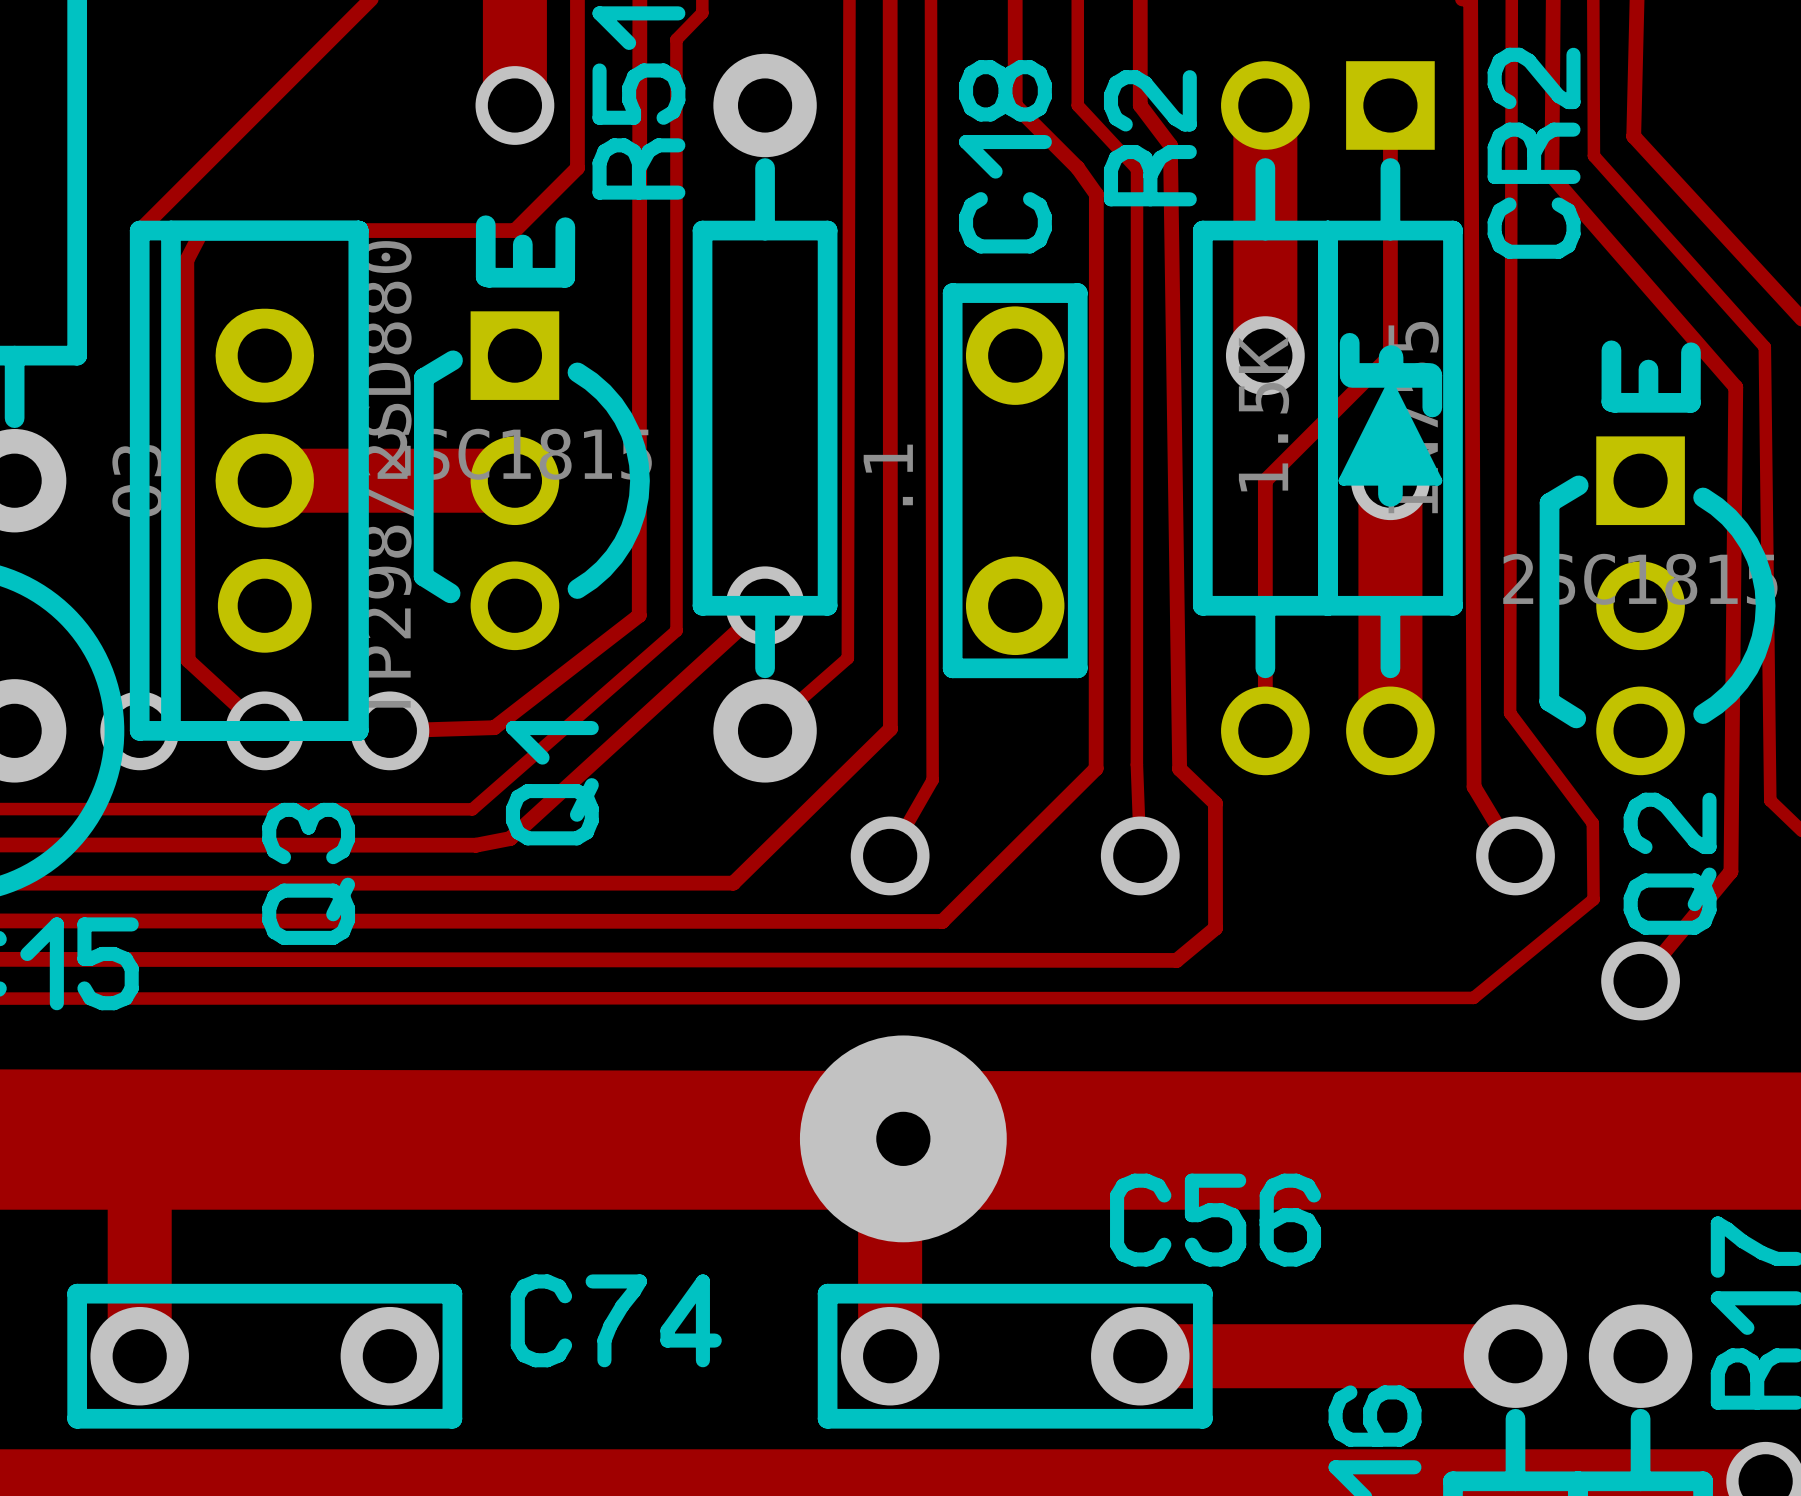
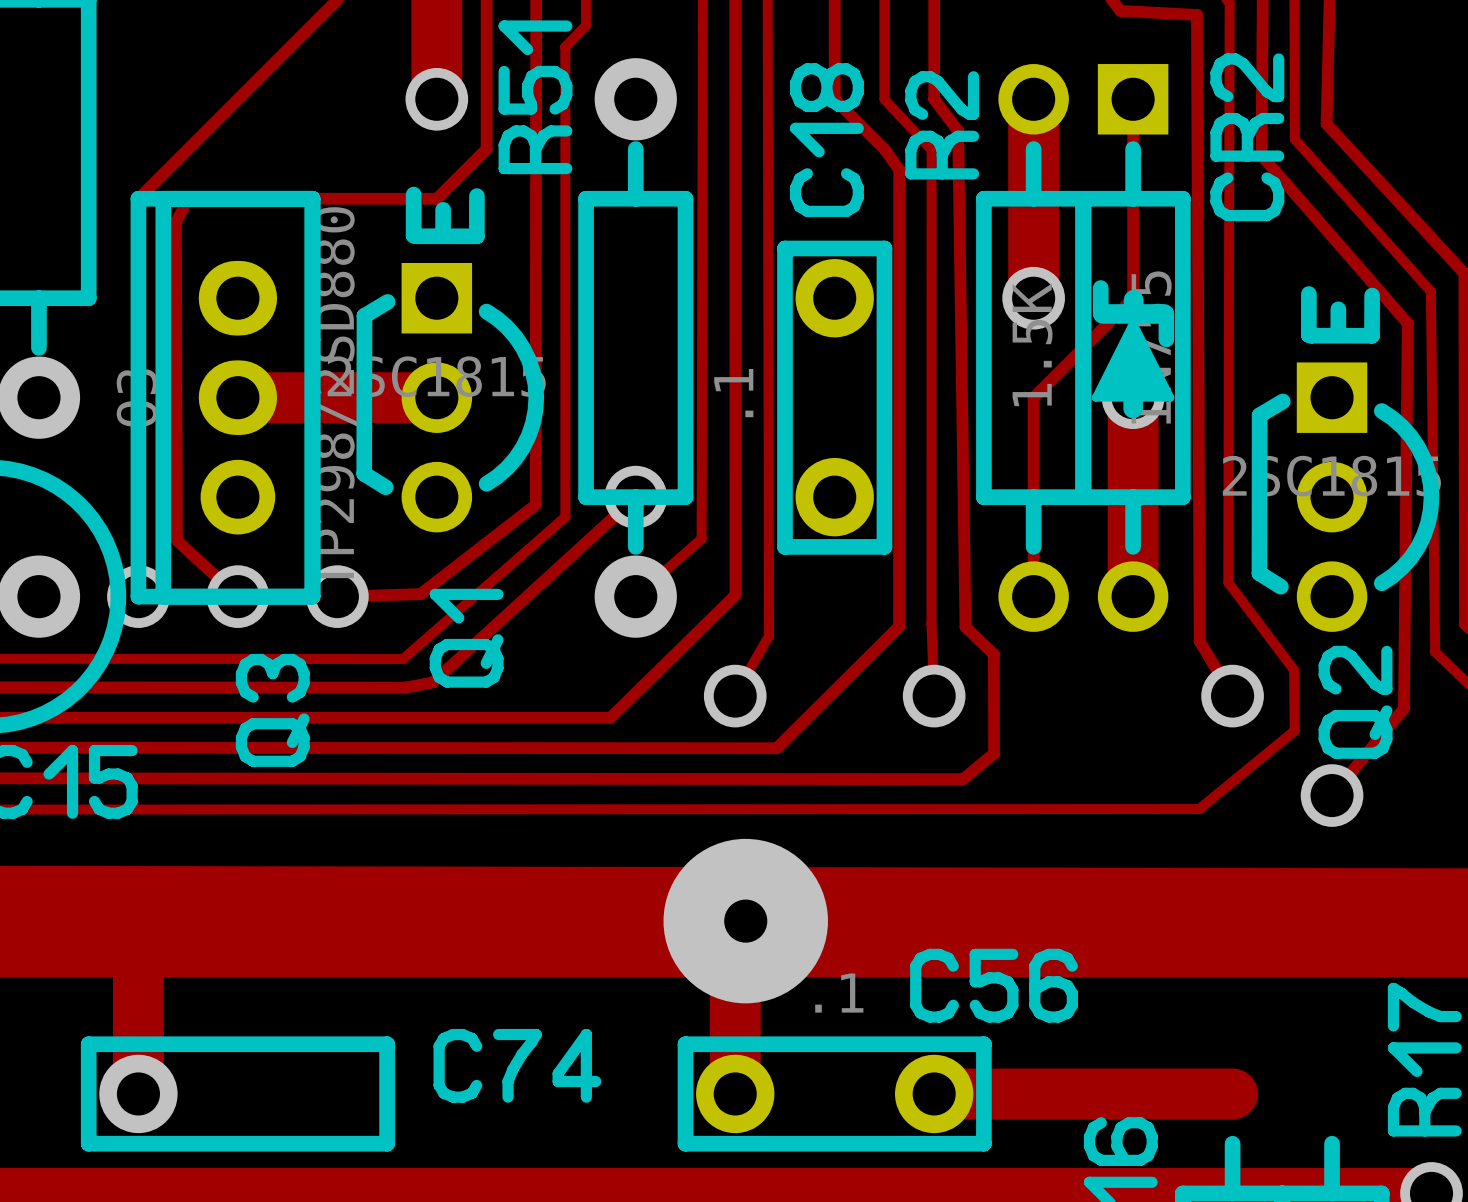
via: (389, 1356) -> none
via: (890, 1356) -> none
part: none -> .1 (834, 1093)
via: (1140, 1356) -> none
via: (1515, 1356) -> none
via: (1640, 1356) -> none

